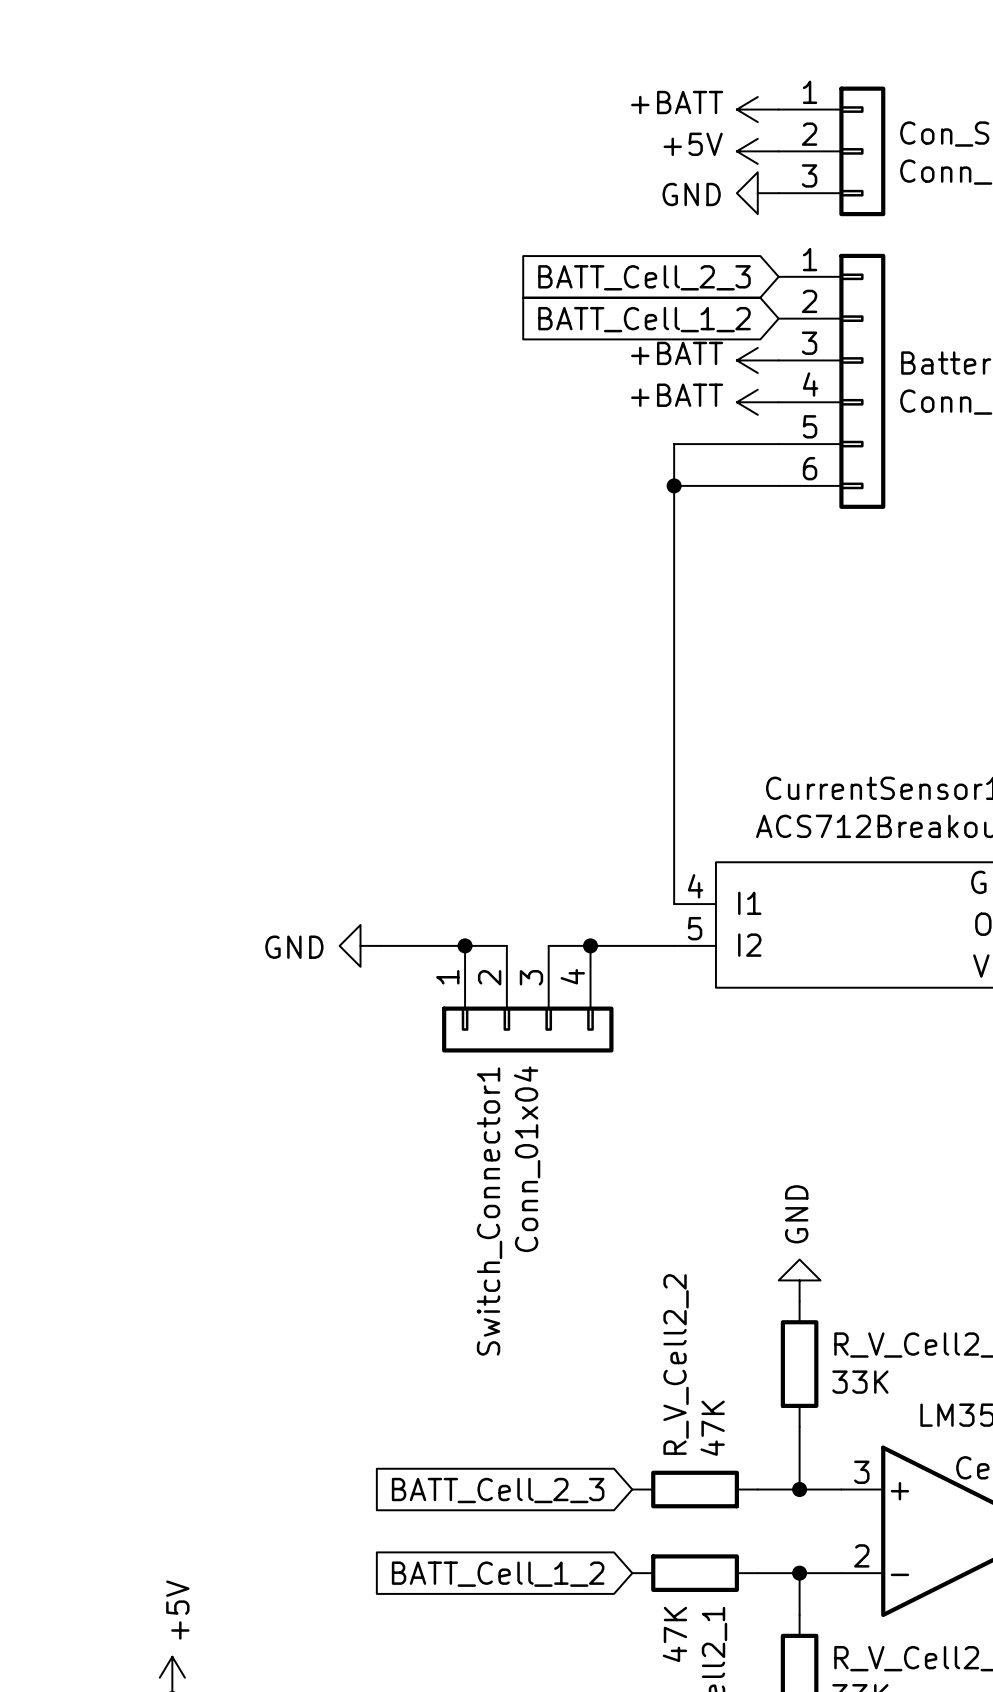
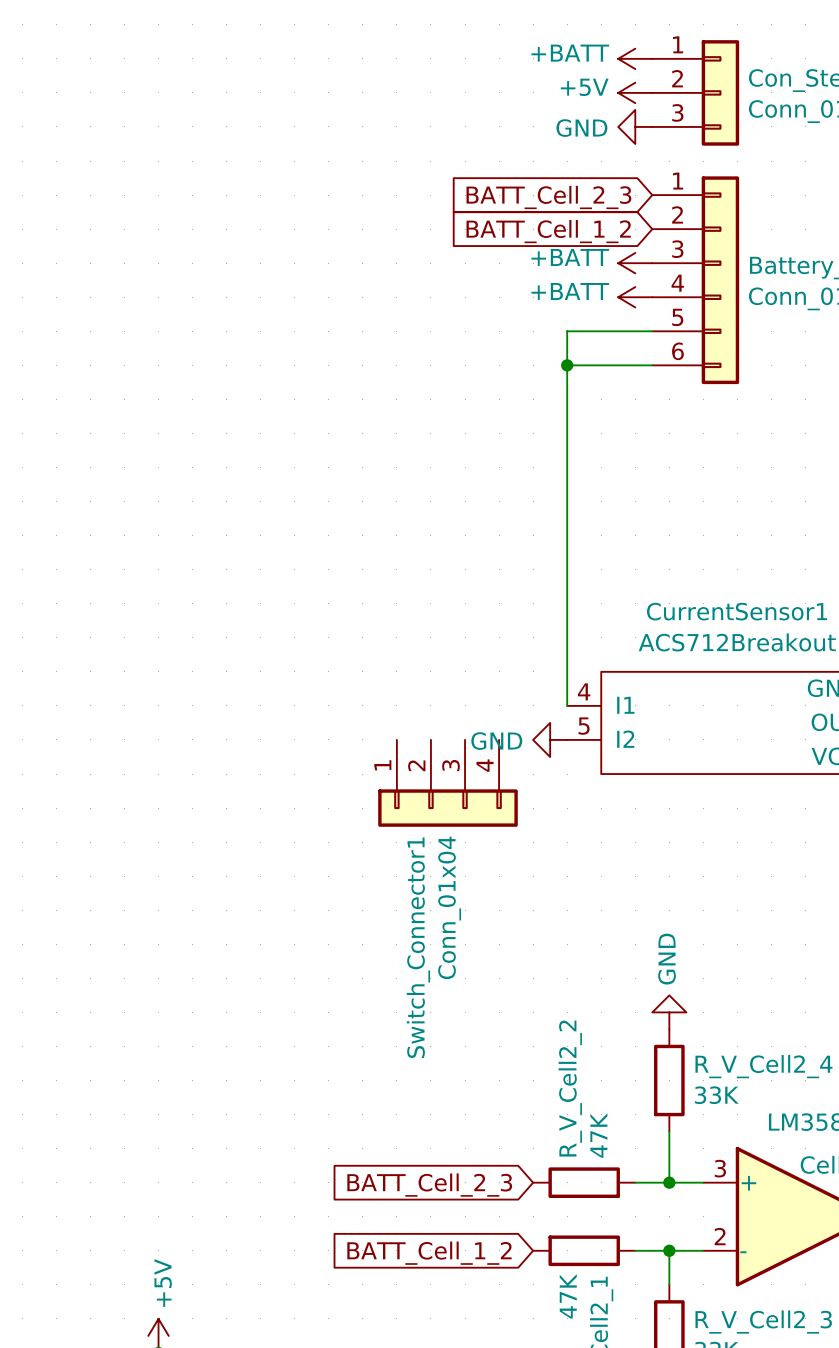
power symbol position: GND (360, 945) -> GND (550, 739)
wire: (381, 945) (506, 945) -> none
junction: (465, 945) -> none
wire: (548, 945) (674, 945) -> none
junction: (590, 945) -> none

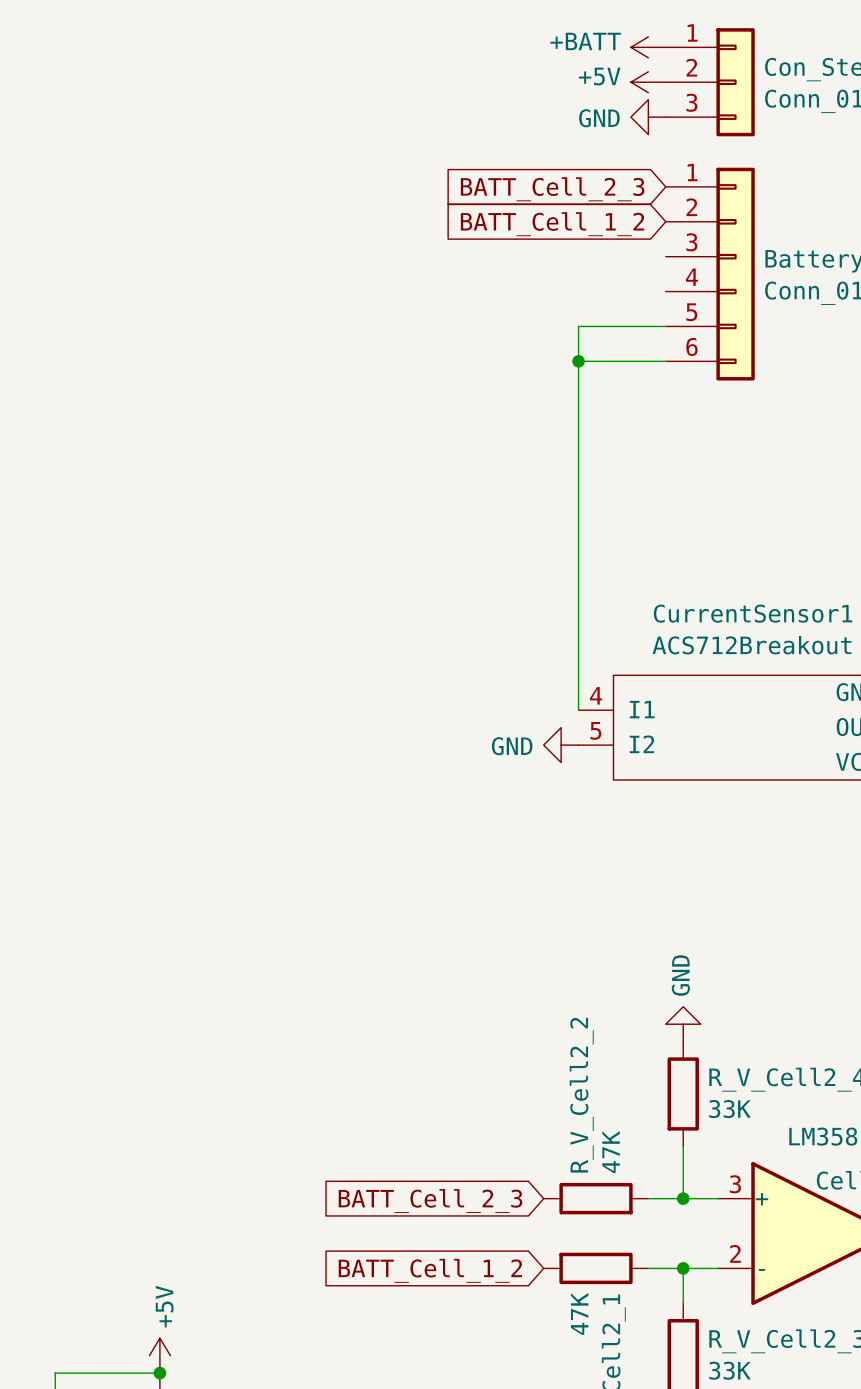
power symbol: +BATT (635, 263) -> none
power symbol: +BATT (635, 297) -> none
Switch_Connector1: Conn_01x04 (447, 783) -> none

